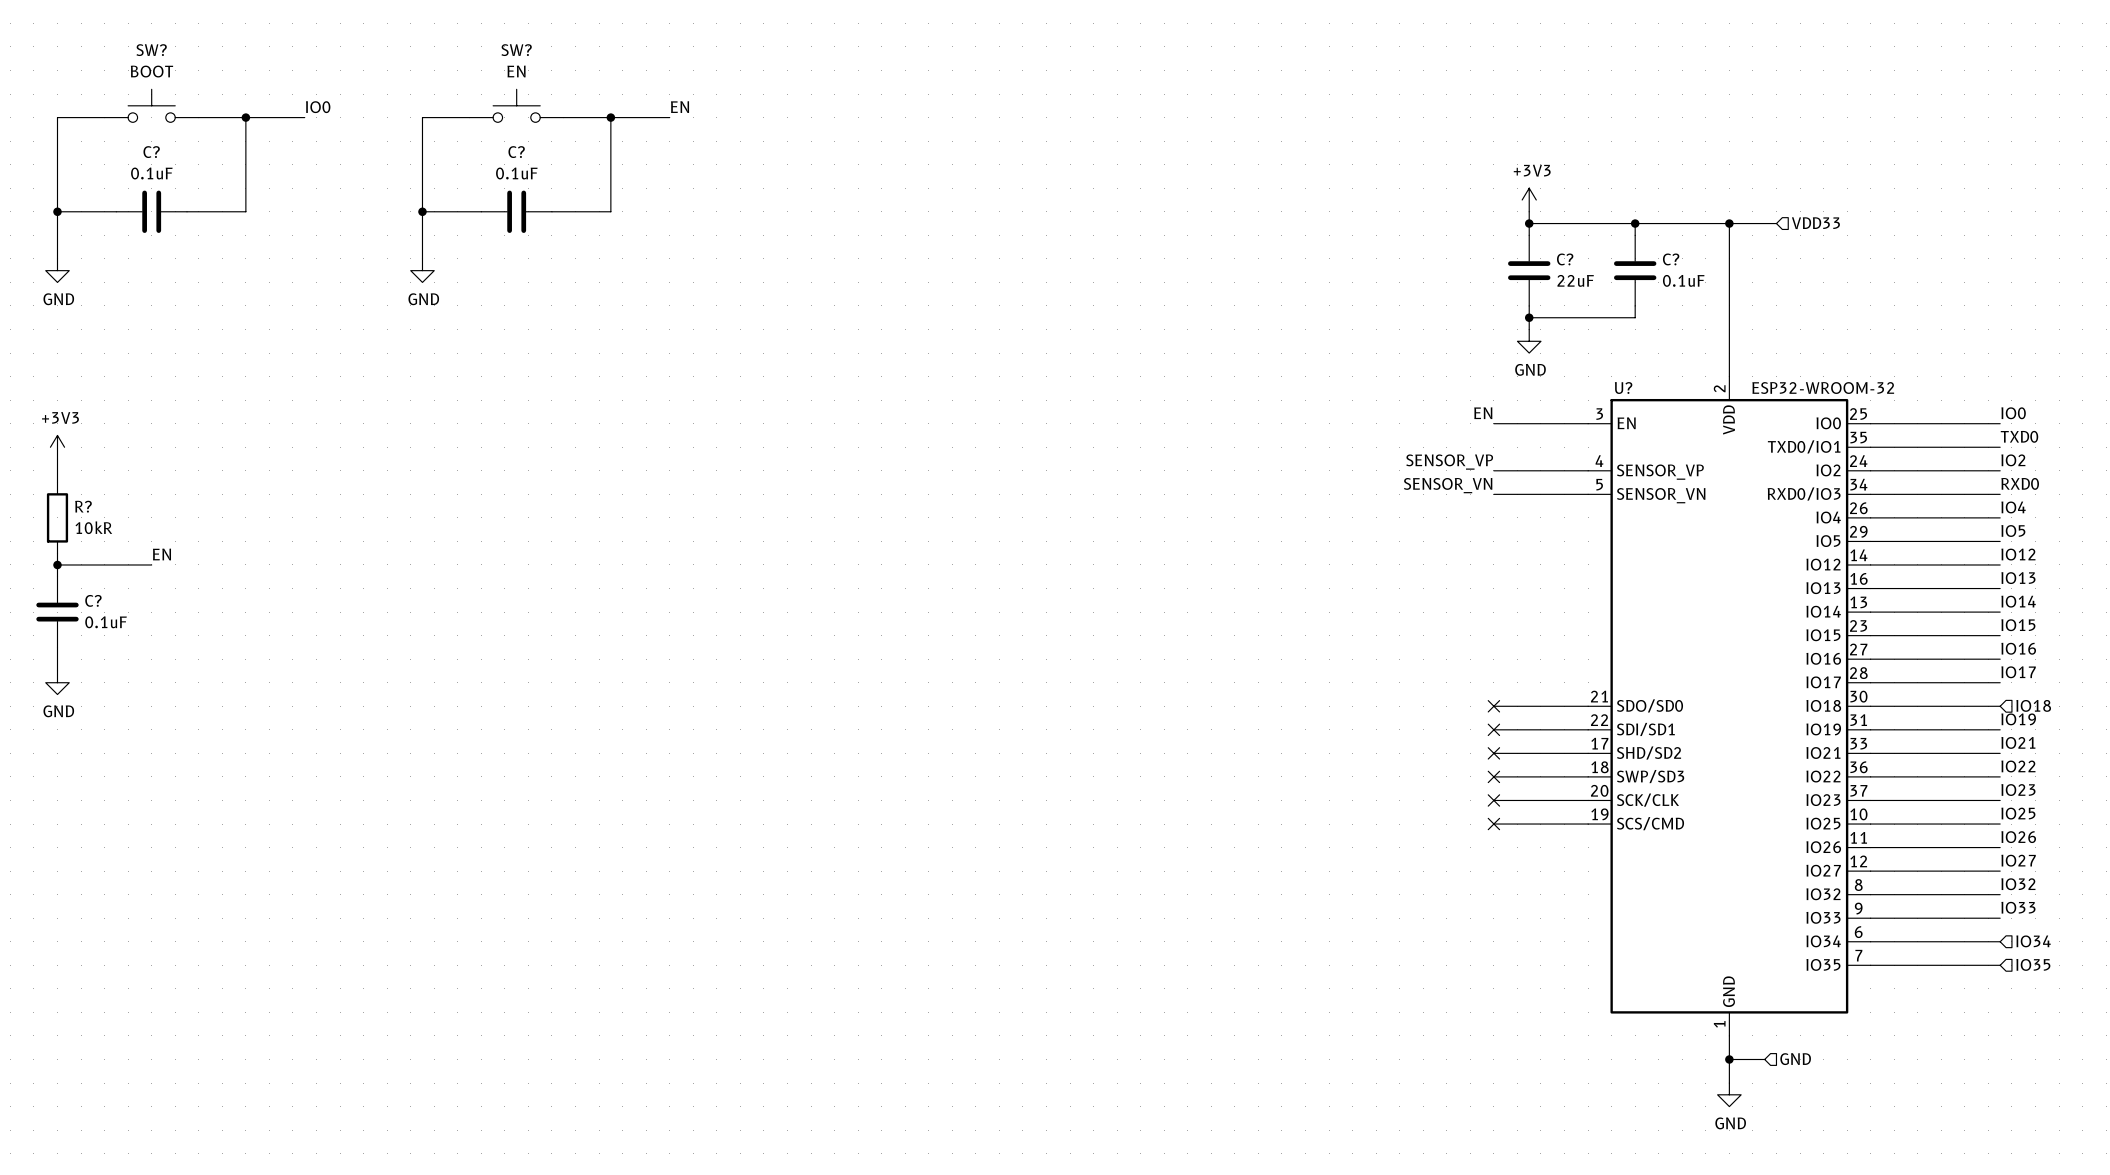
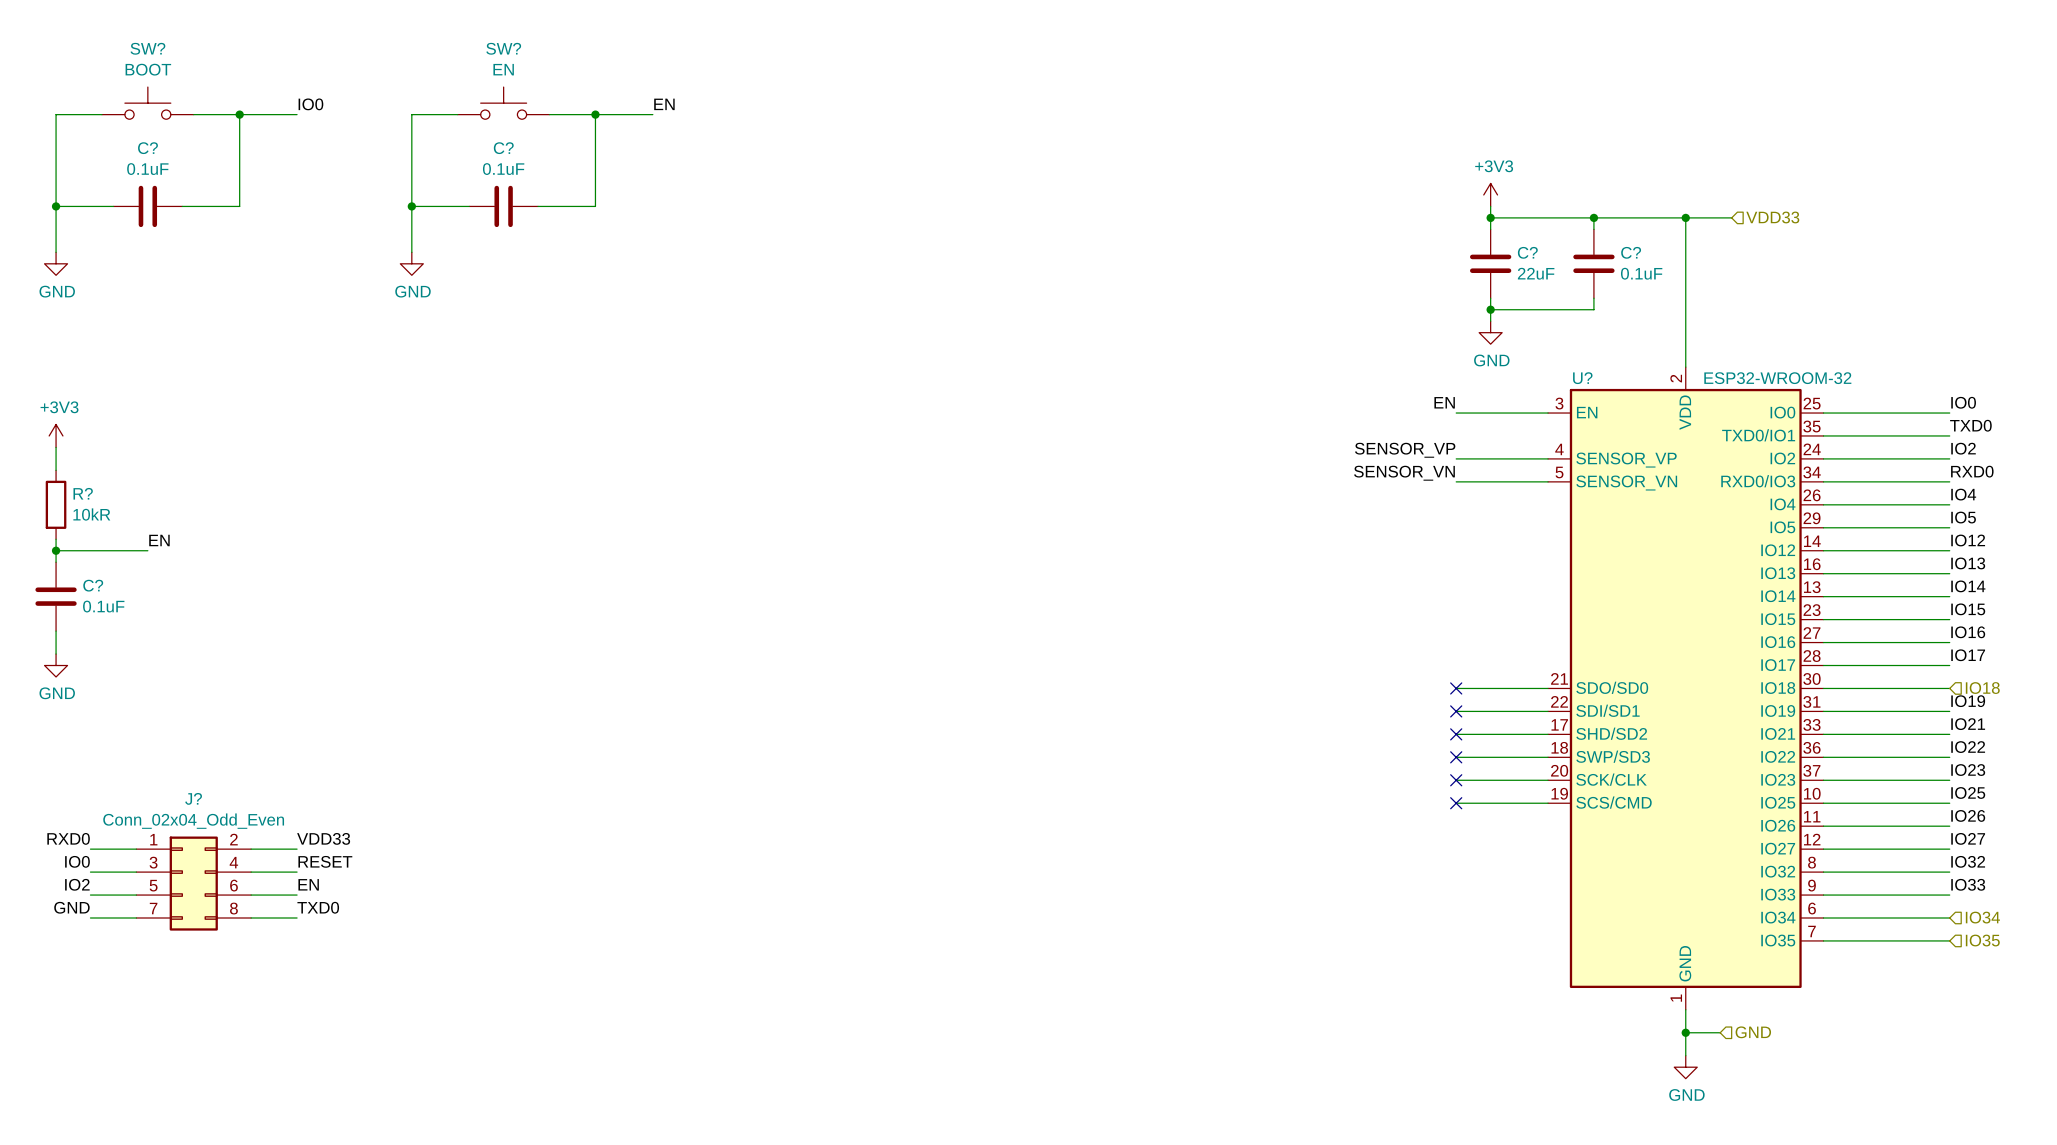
label: none -> RXD0 (68, 838)
label: none -> VDD33 (323, 838)
wire: none -> (90, 849) (136, 849)
wire: none -> (251, 849) (297, 849)
label: none -> IO0 (77, 861)
label: none -> RESET (325, 861)
wire: none -> (90, 872) (136, 872)
wire: none -> (251, 872) (297, 872)
J?: none -> Conn_02x04_Odd_Even (193, 883)
label: none -> IO2 (77, 884)
label: none -> EN (308, 884)
wire: none -> (90, 895) (136, 895)
wire: none -> (251, 895) (297, 895)
label: none -> GND (71, 907)
label: none -> TXD0 (318, 907)
wire: none -> (90, 918) (136, 918)
wire: none -> (251, 918) (297, 918)

